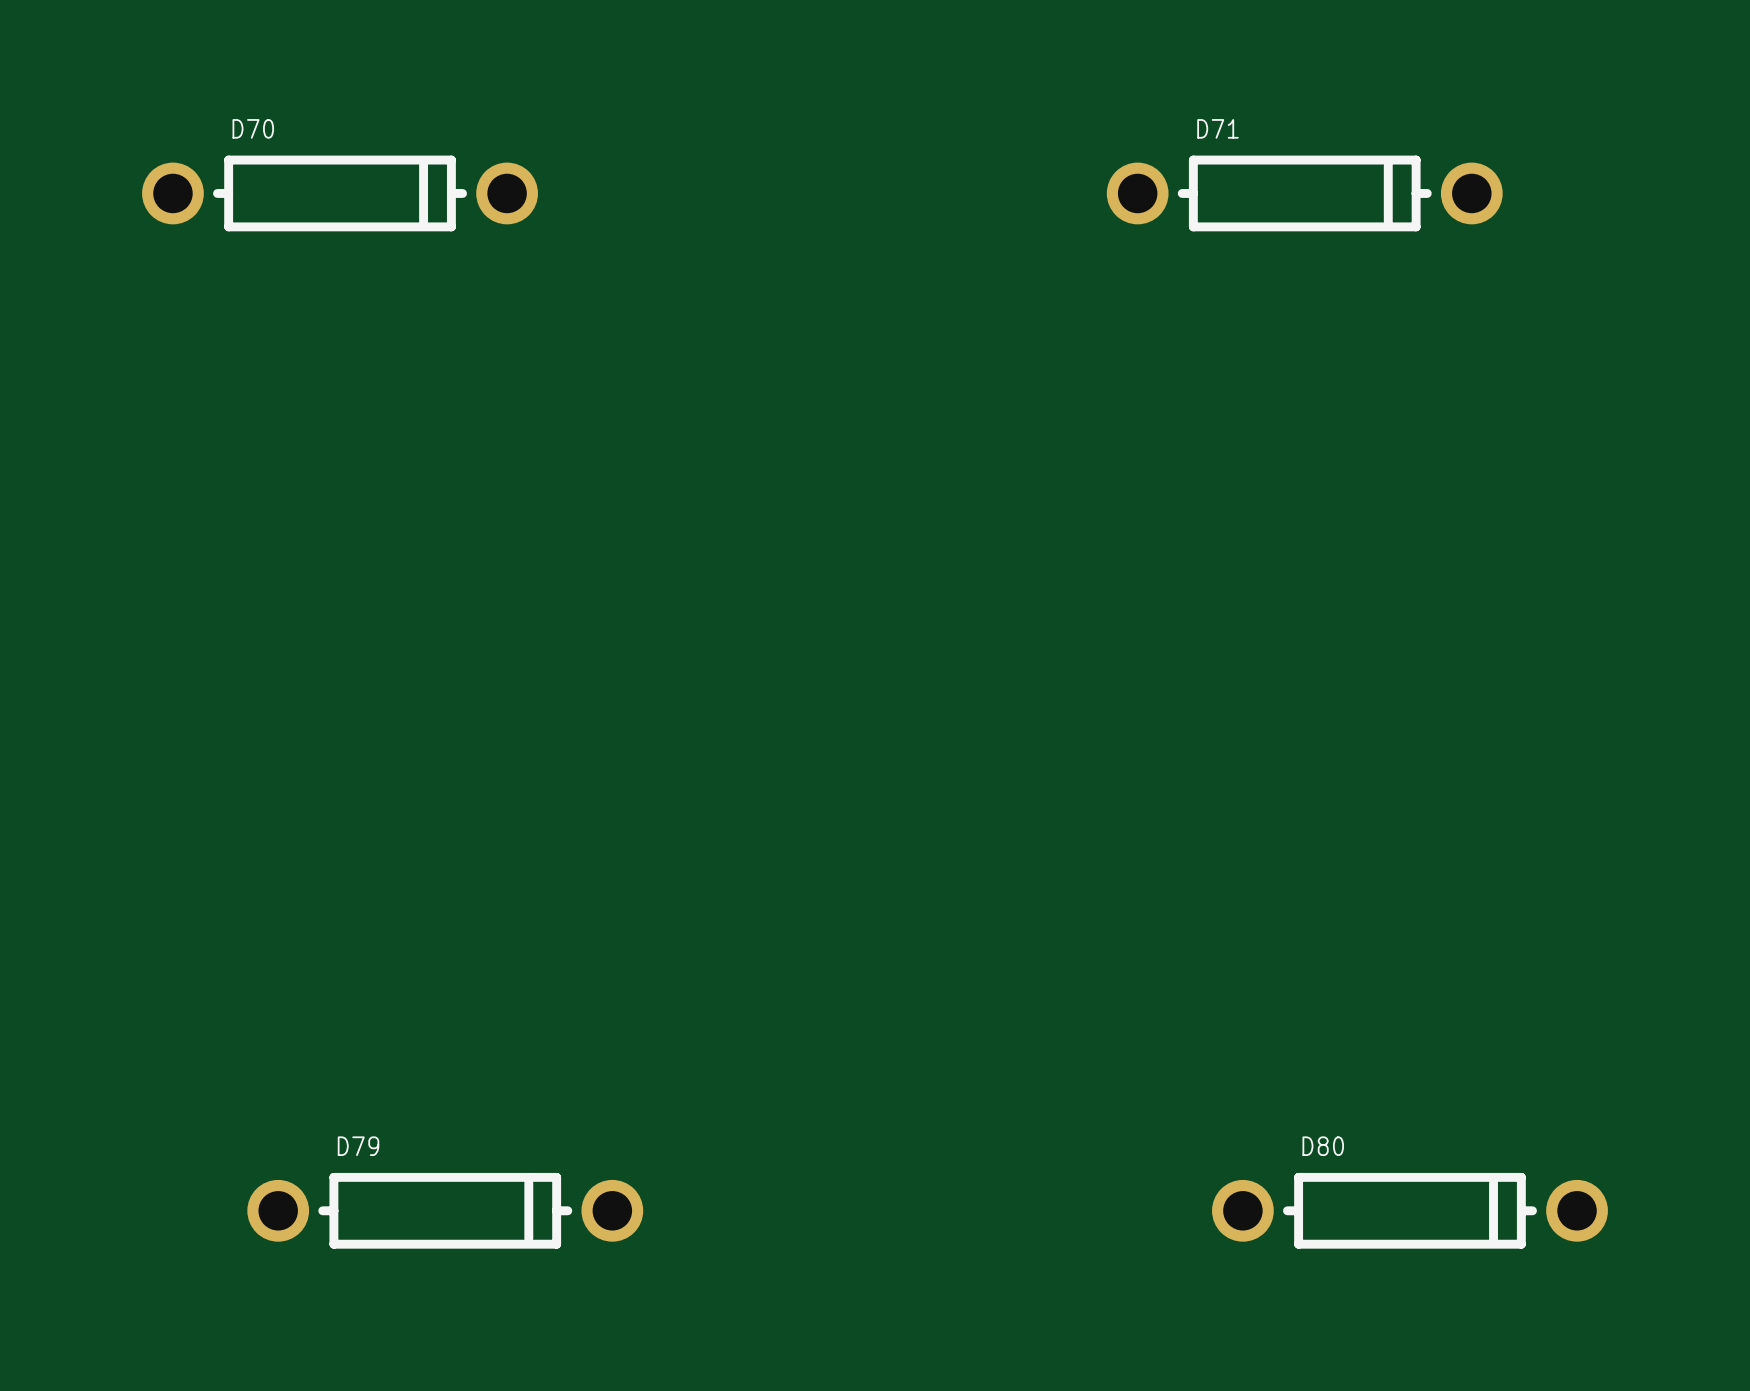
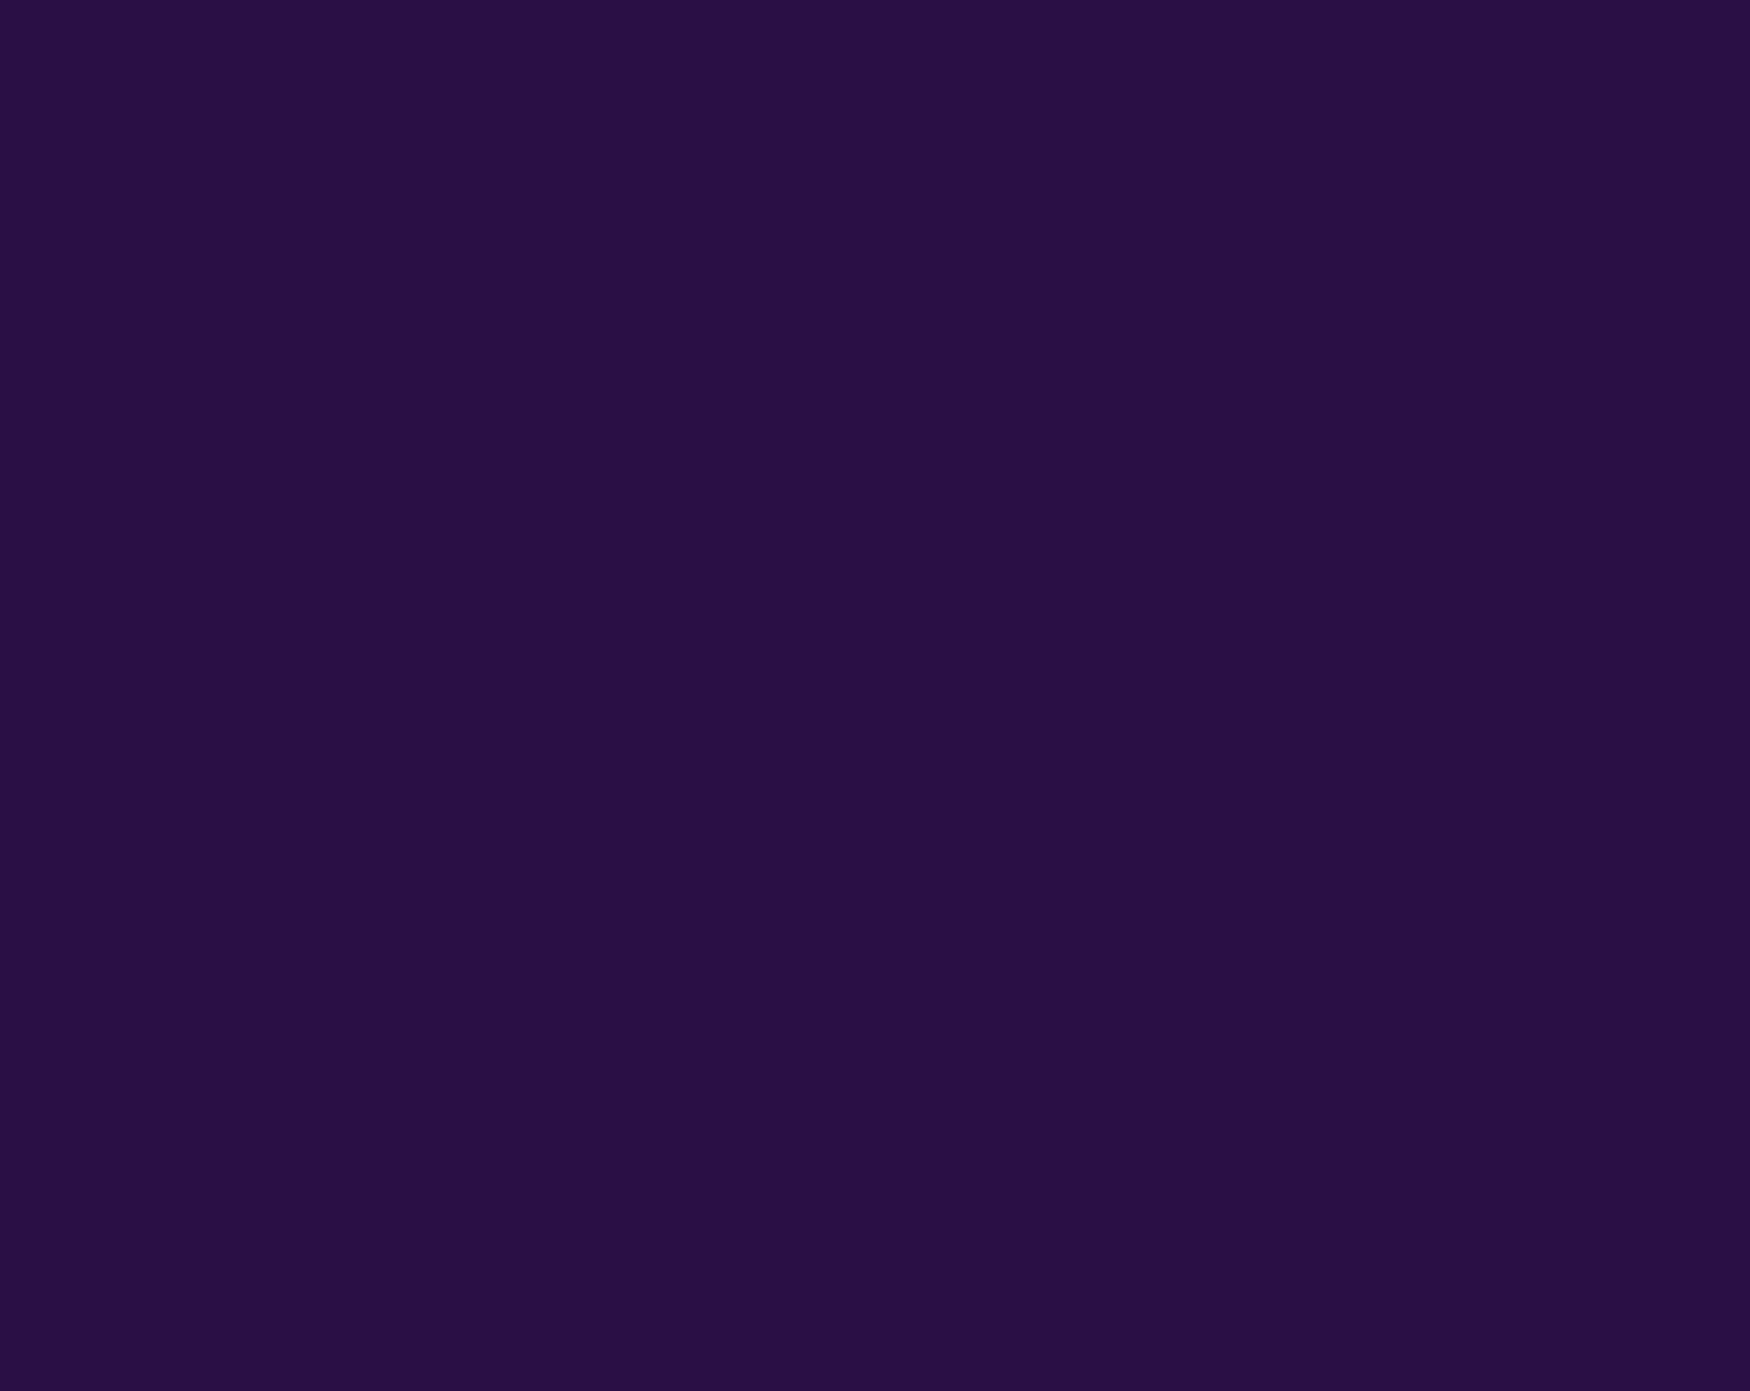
D70: (340, 193) -> none
D71: (1304, 193) -> none
D79: (445, 1210) -> none
D80: (1409, 1210) -> none

